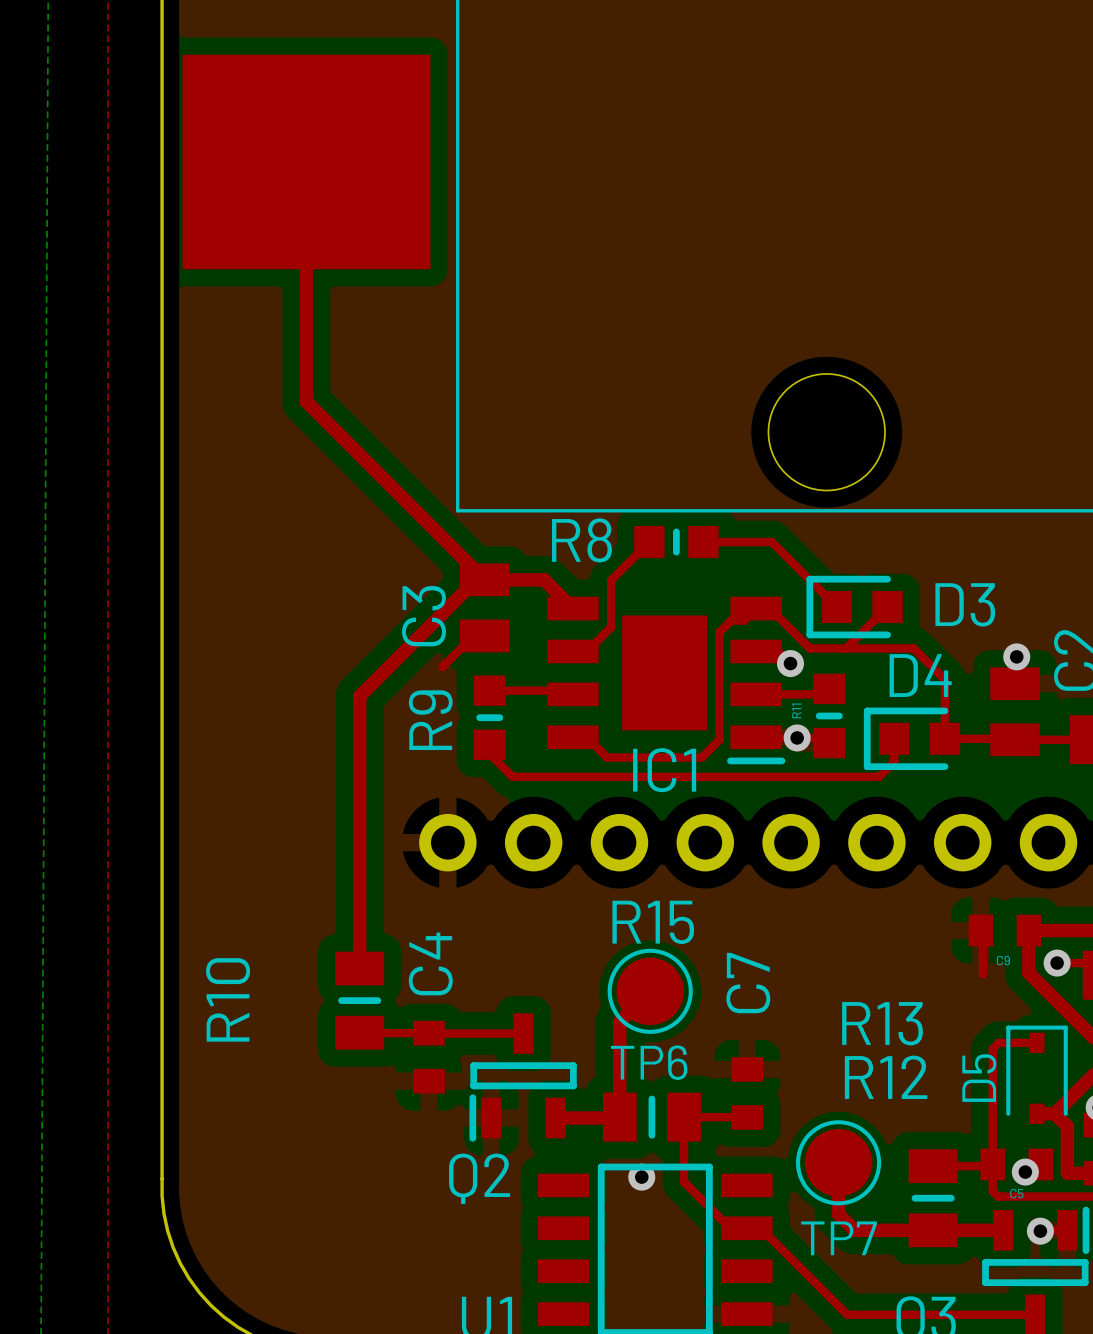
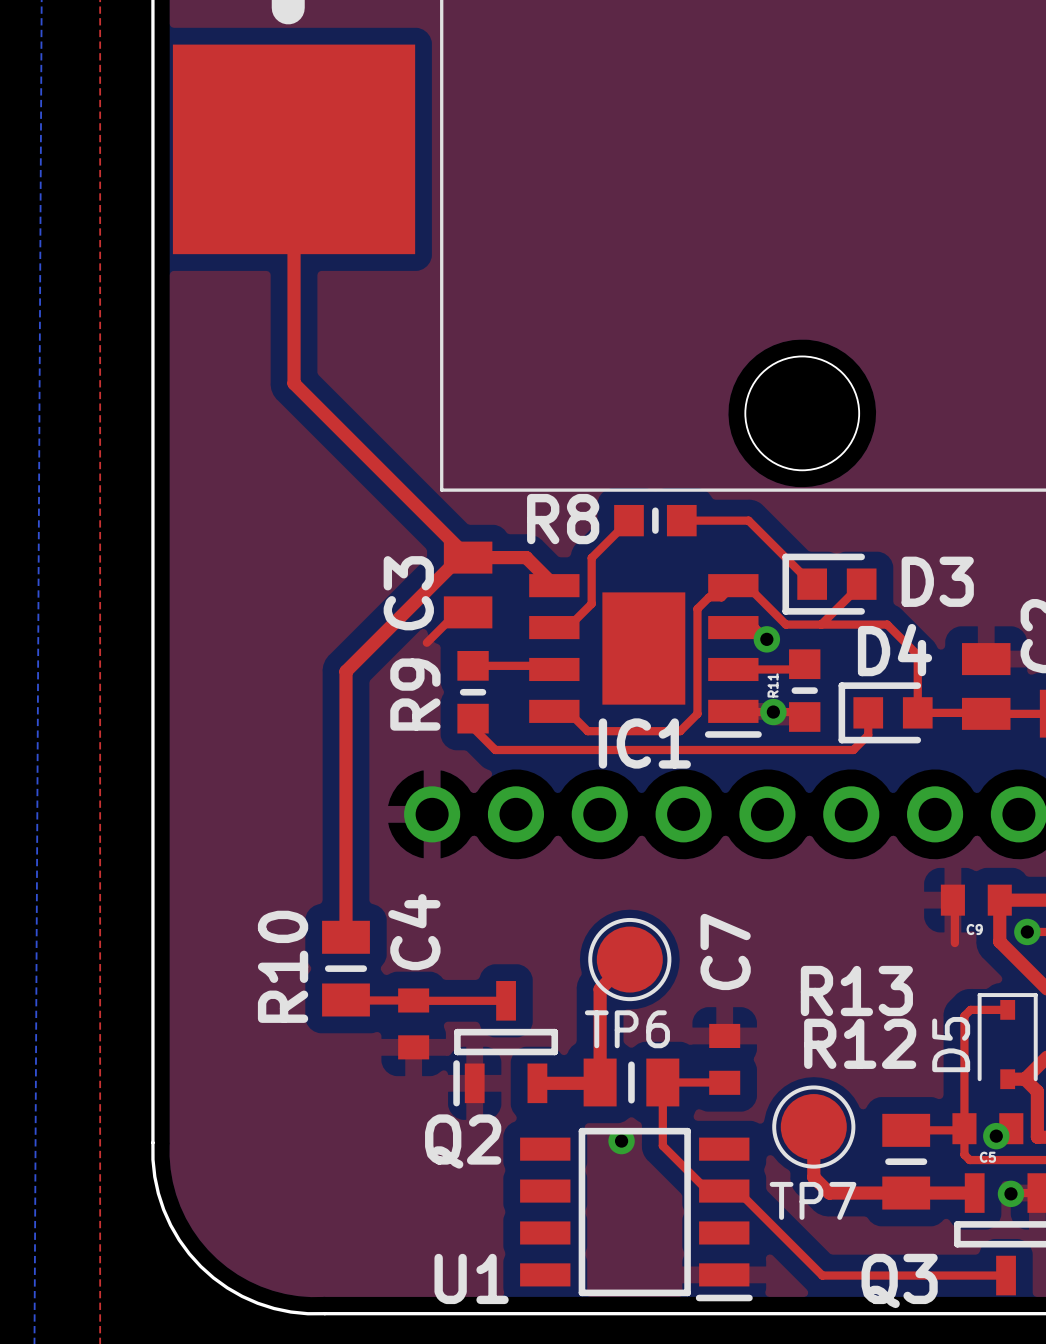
via: (1016, 656) -> none
R15 name: R15 (653, 922) -> none
R10 name position: R10 (228, 999) -> R10 (283, 966)

